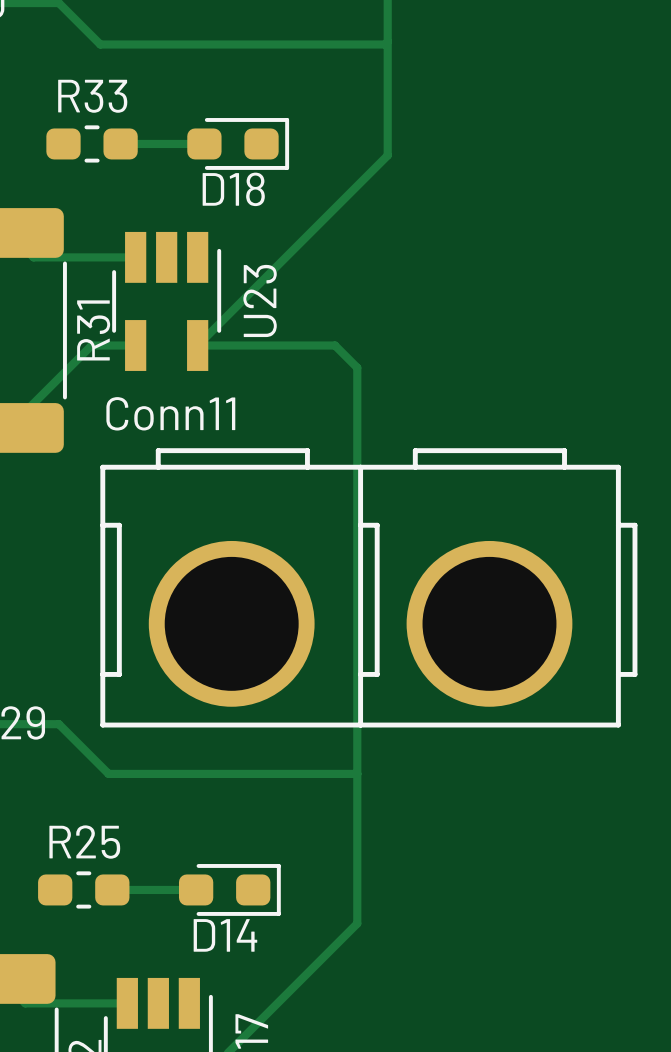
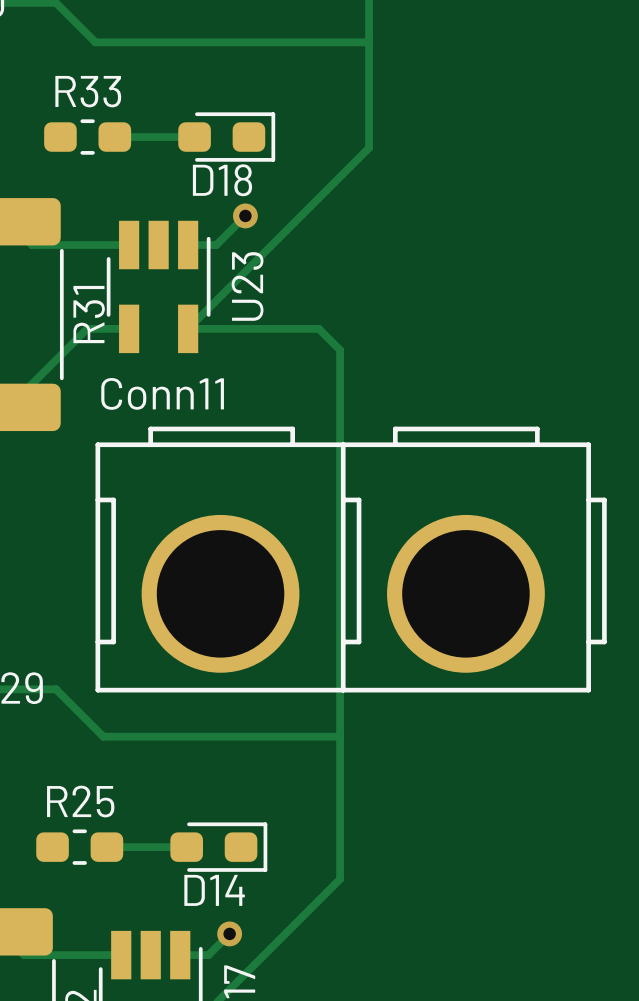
track: none -> (245, 215) (216, 245) (188, 245)
via: none -> (245, 215)
track: none -> (229, 933) (208, 955) (180, 955)
via: none -> (229, 933)

